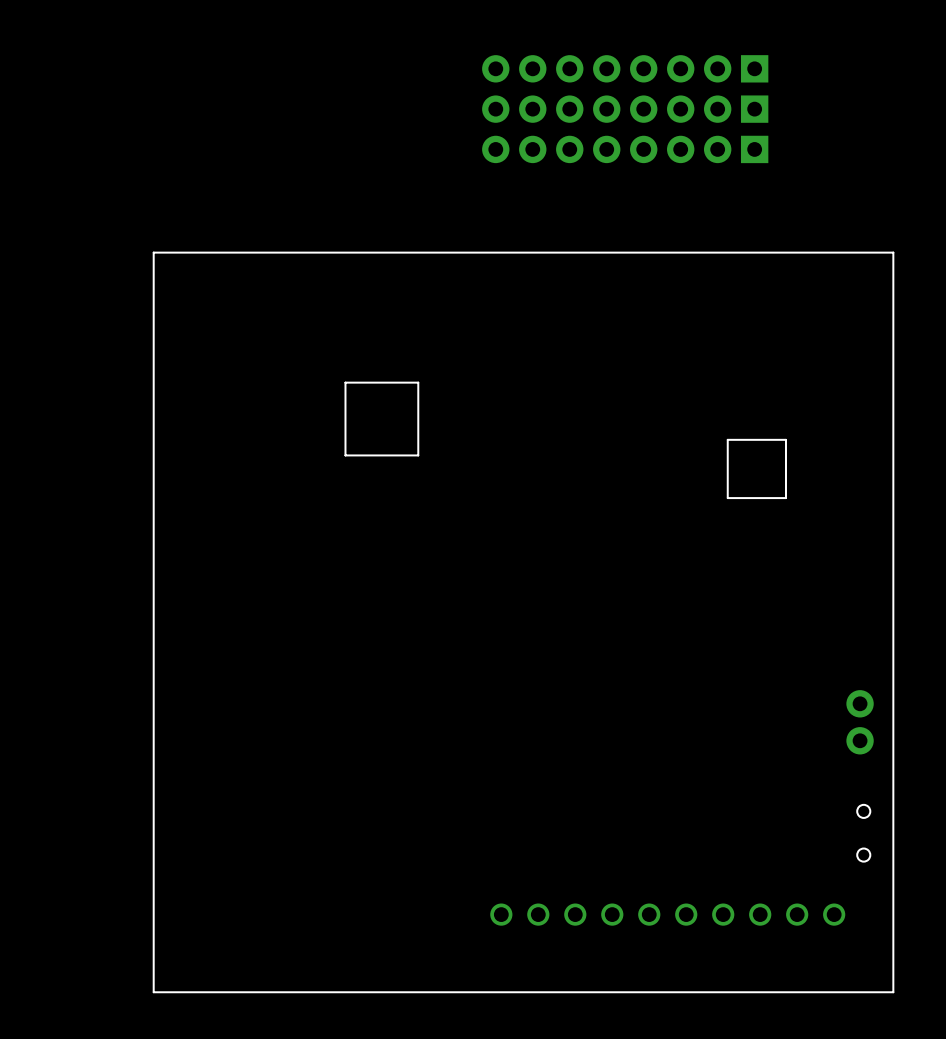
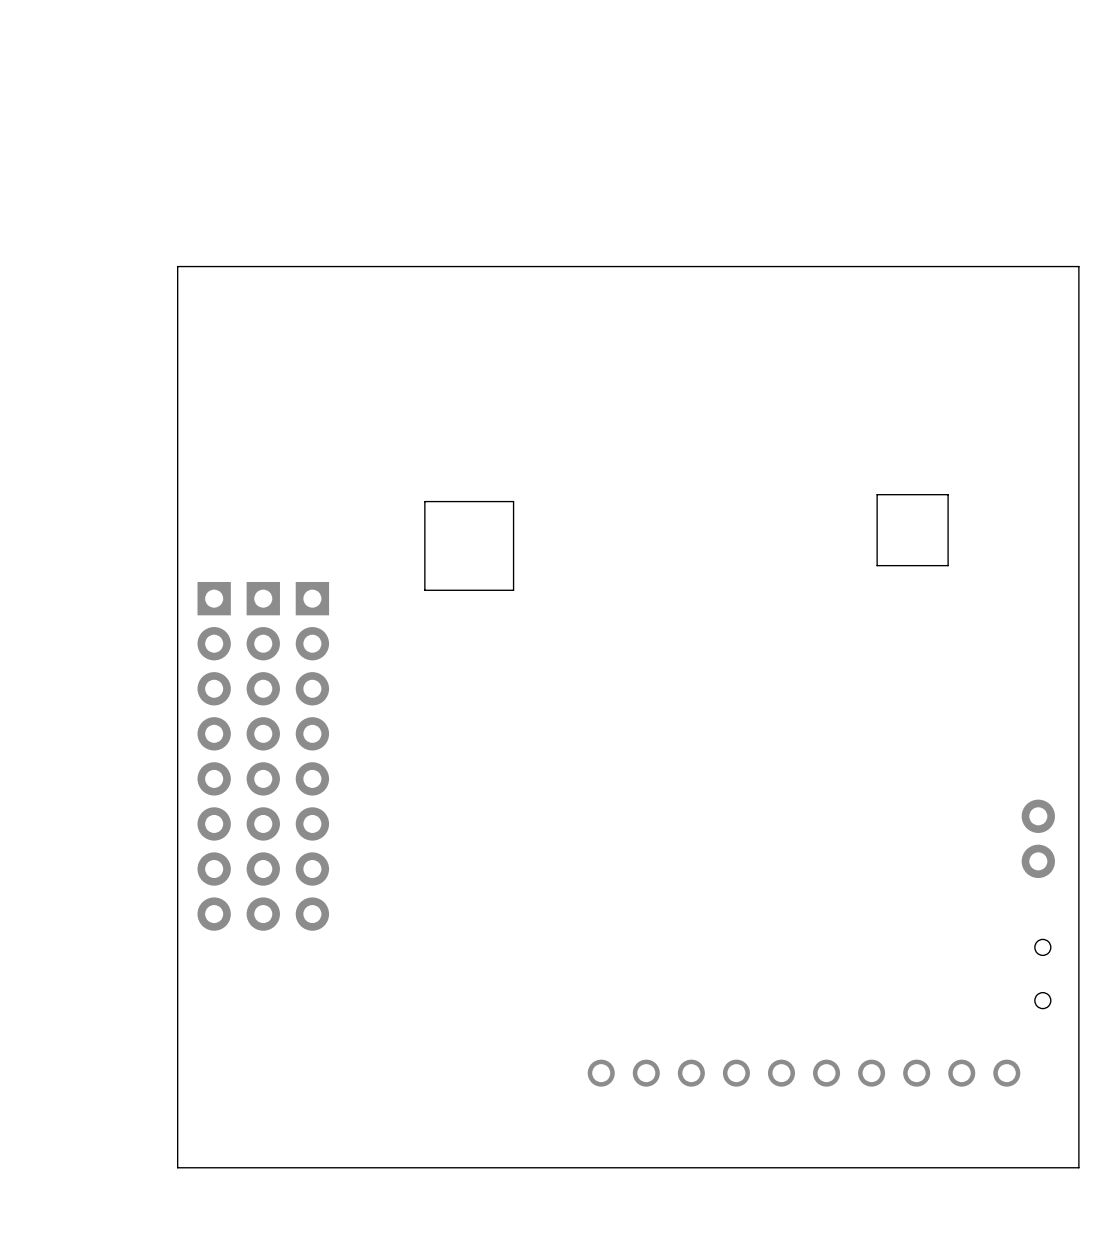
part: (625, 68) -> none
part: (625, 109) -> none
part: (625, 149) -> none
part position: (381, 419) -> (469, 545)
part: none -> (214, 756)
part: none -> (263, 756)
part: none -> (312, 756)

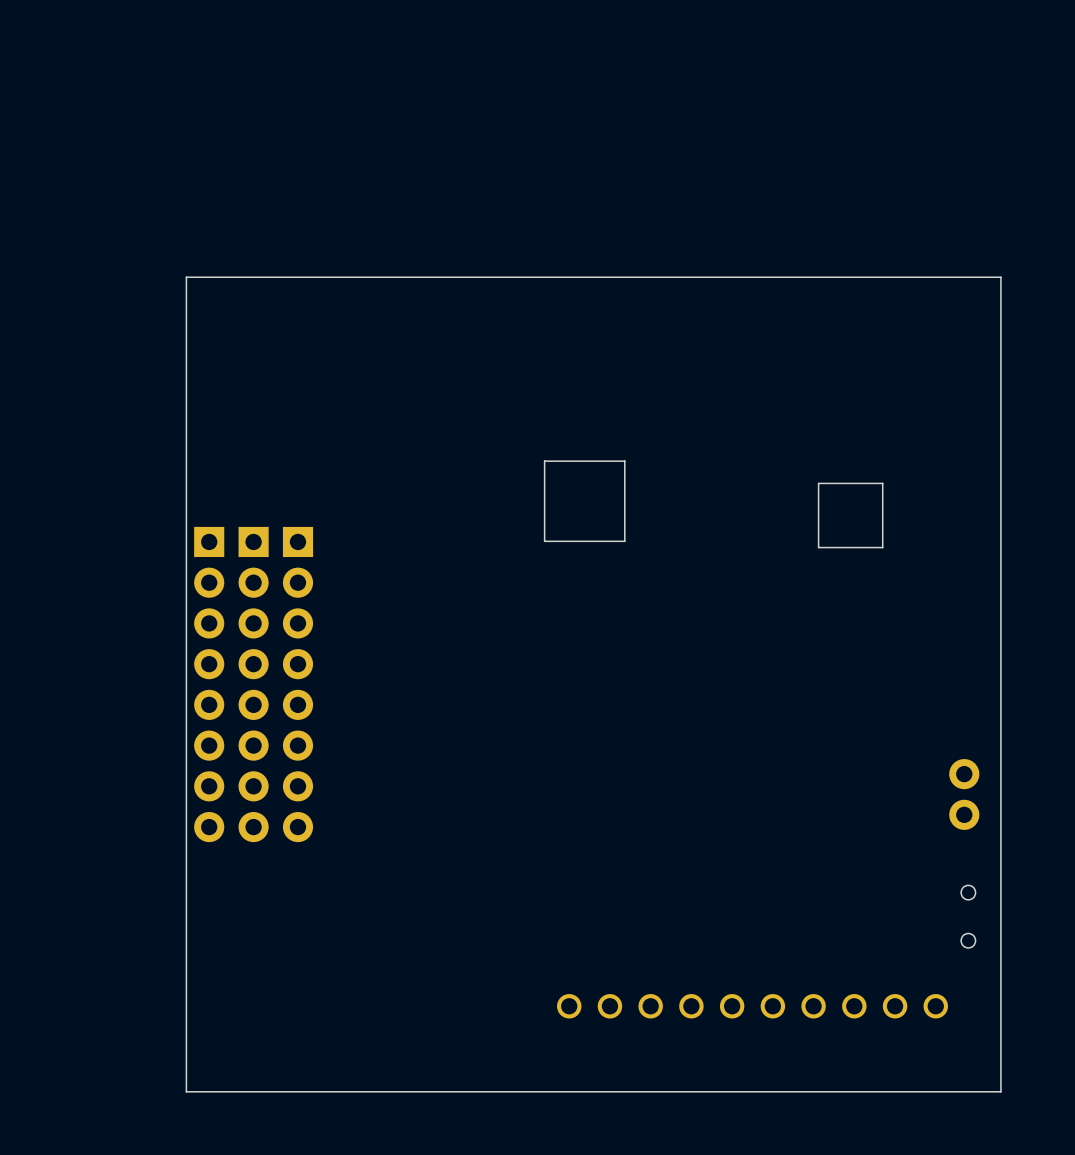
part position: (469, 545) -> (584, 501)
part: none -> (209, 684)
part: none -> (253, 684)
part: none -> (297, 684)
part: (214, 756) -> none
part: (263, 756) -> none
part: (312, 756) -> none

